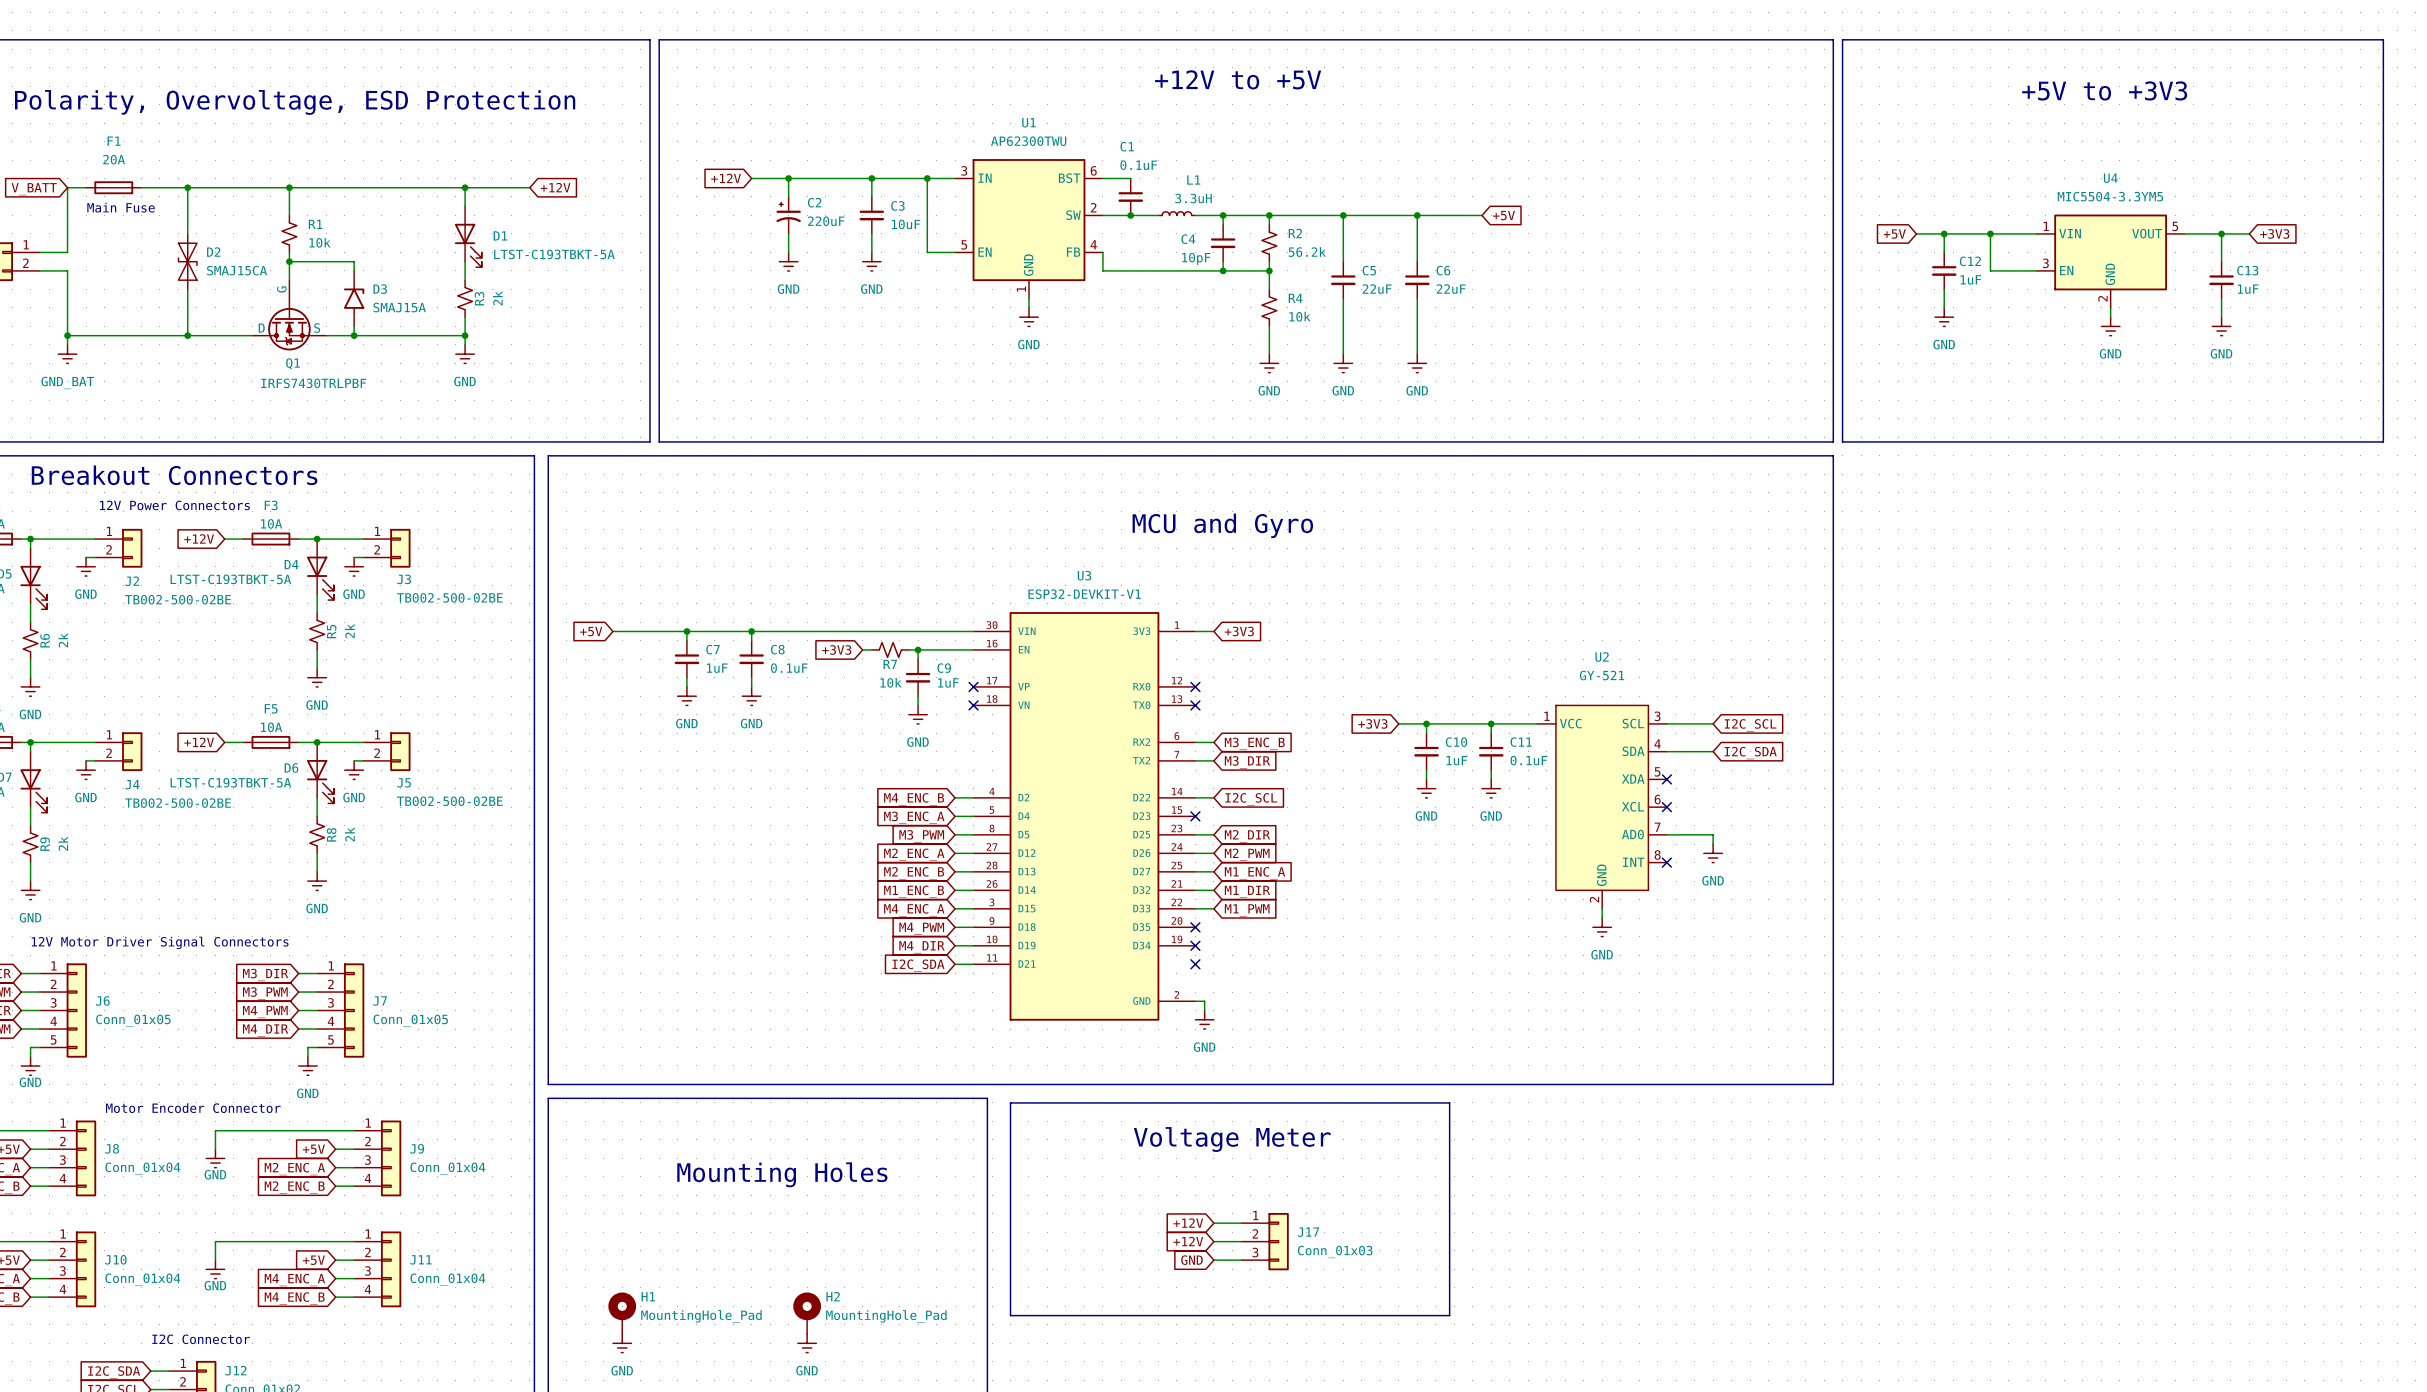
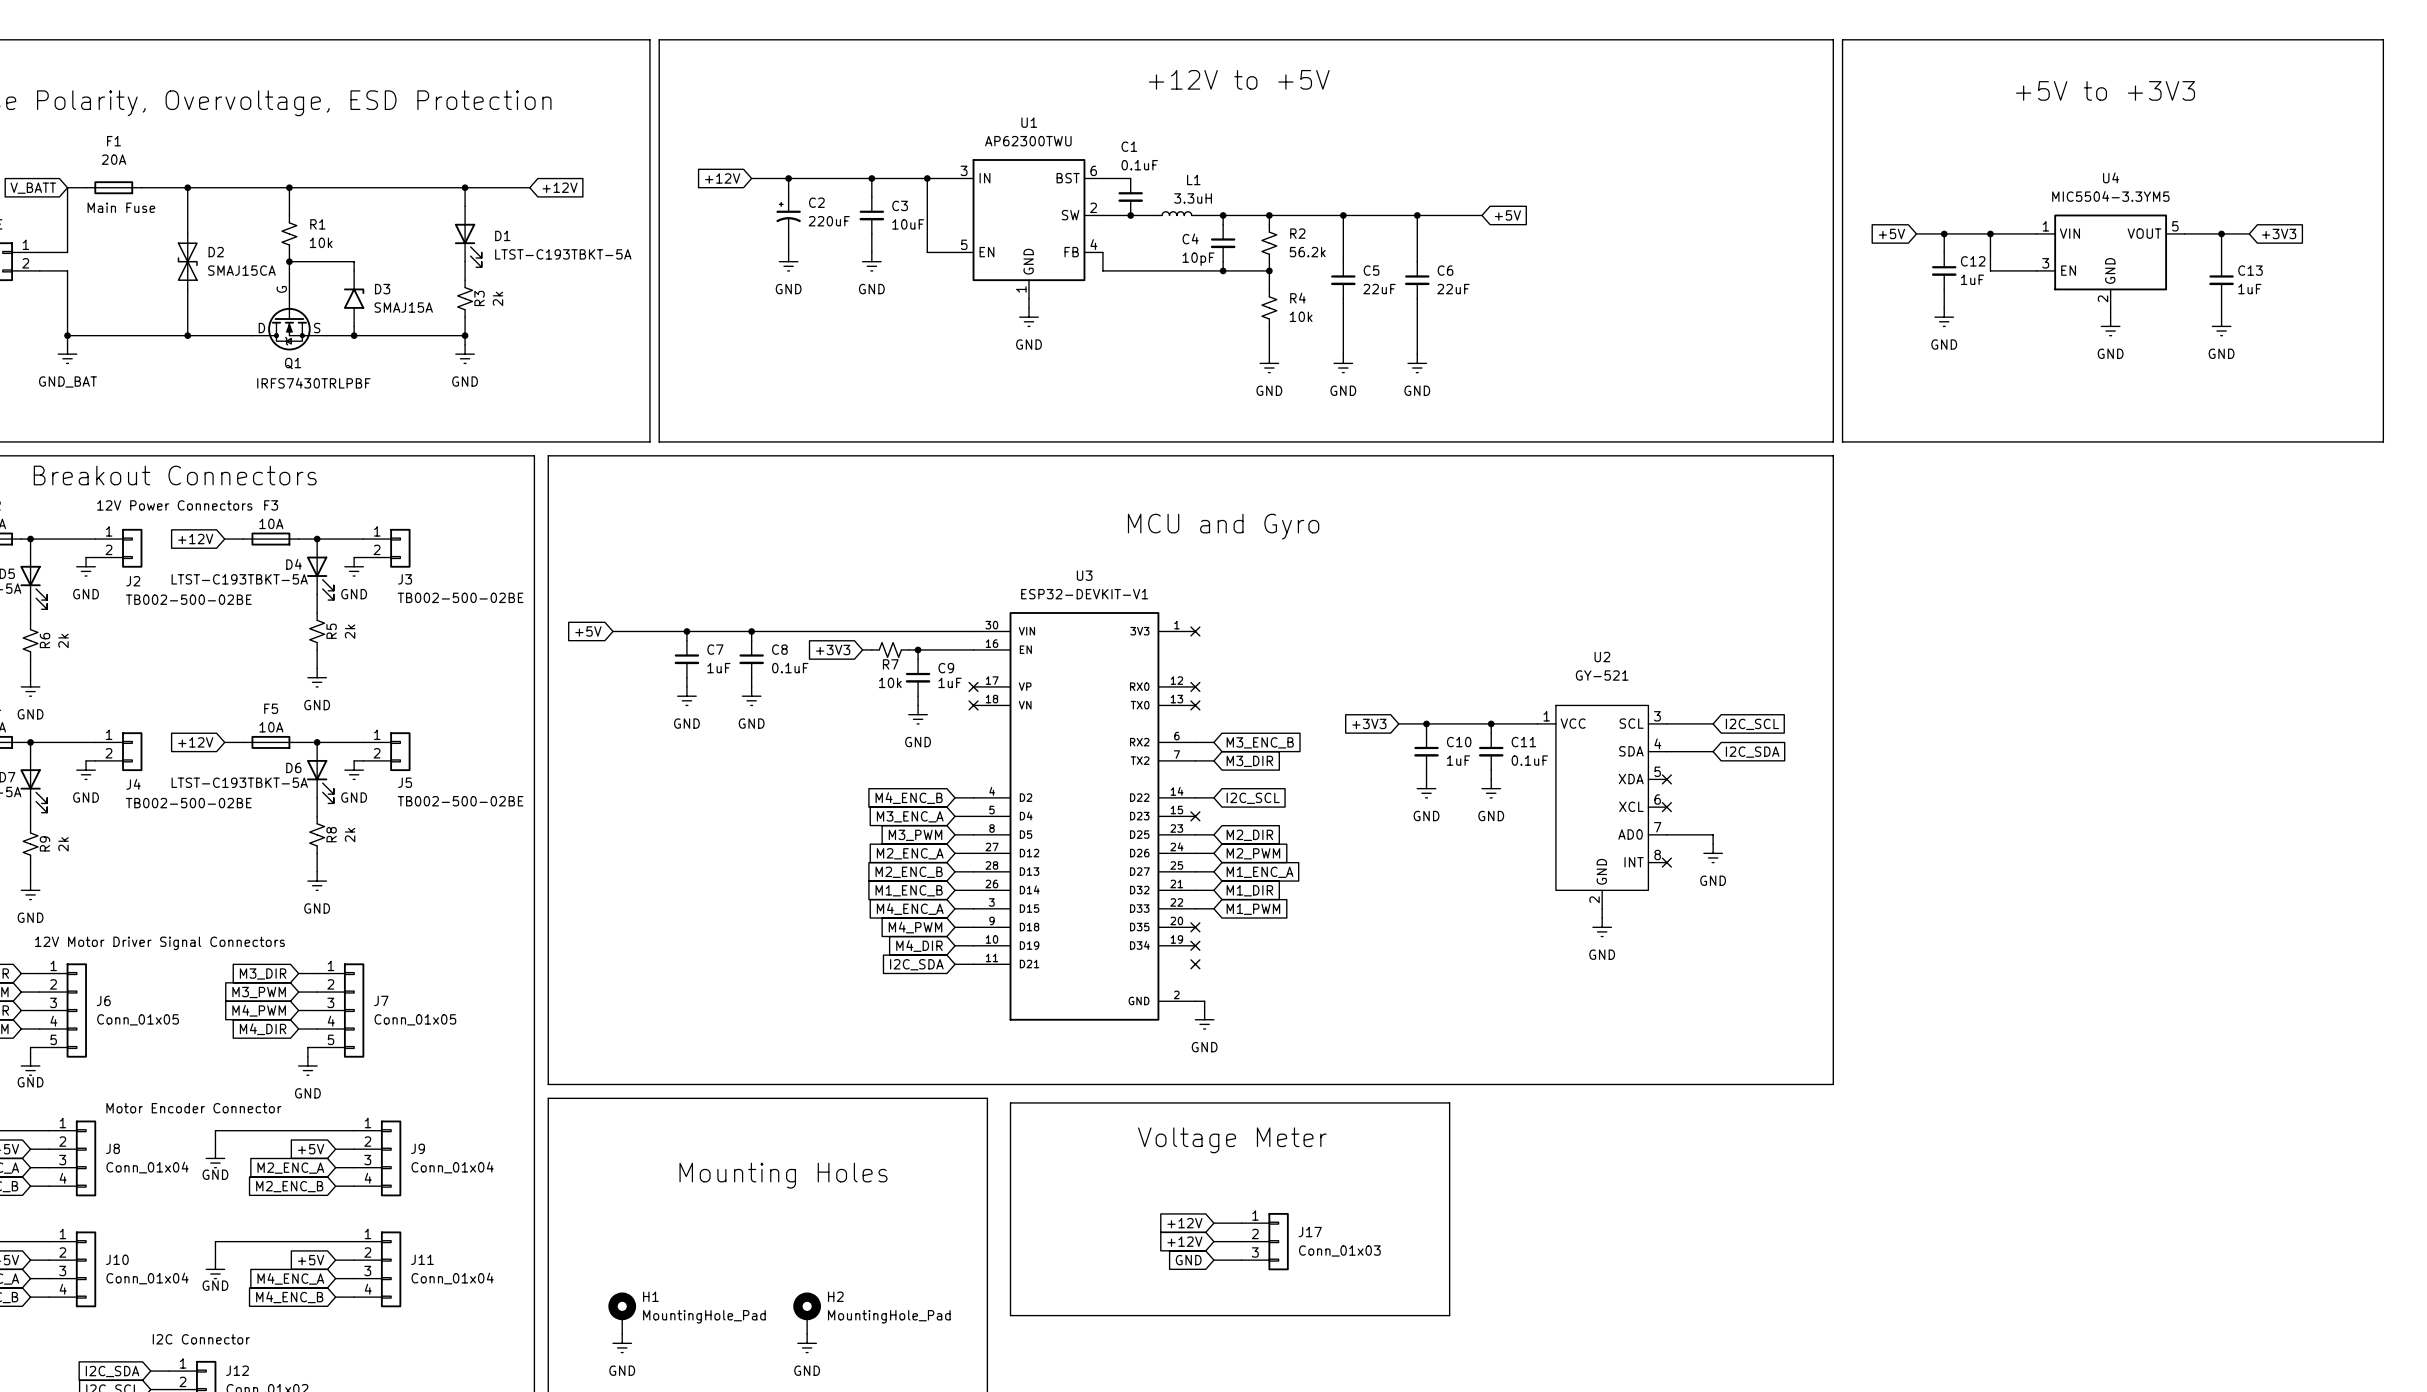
wire: (1195, 631) (1213, 631) -> none
no-connect mark: none -> (1195, 631)
global label: +3V3 (1239, 631) -> none

